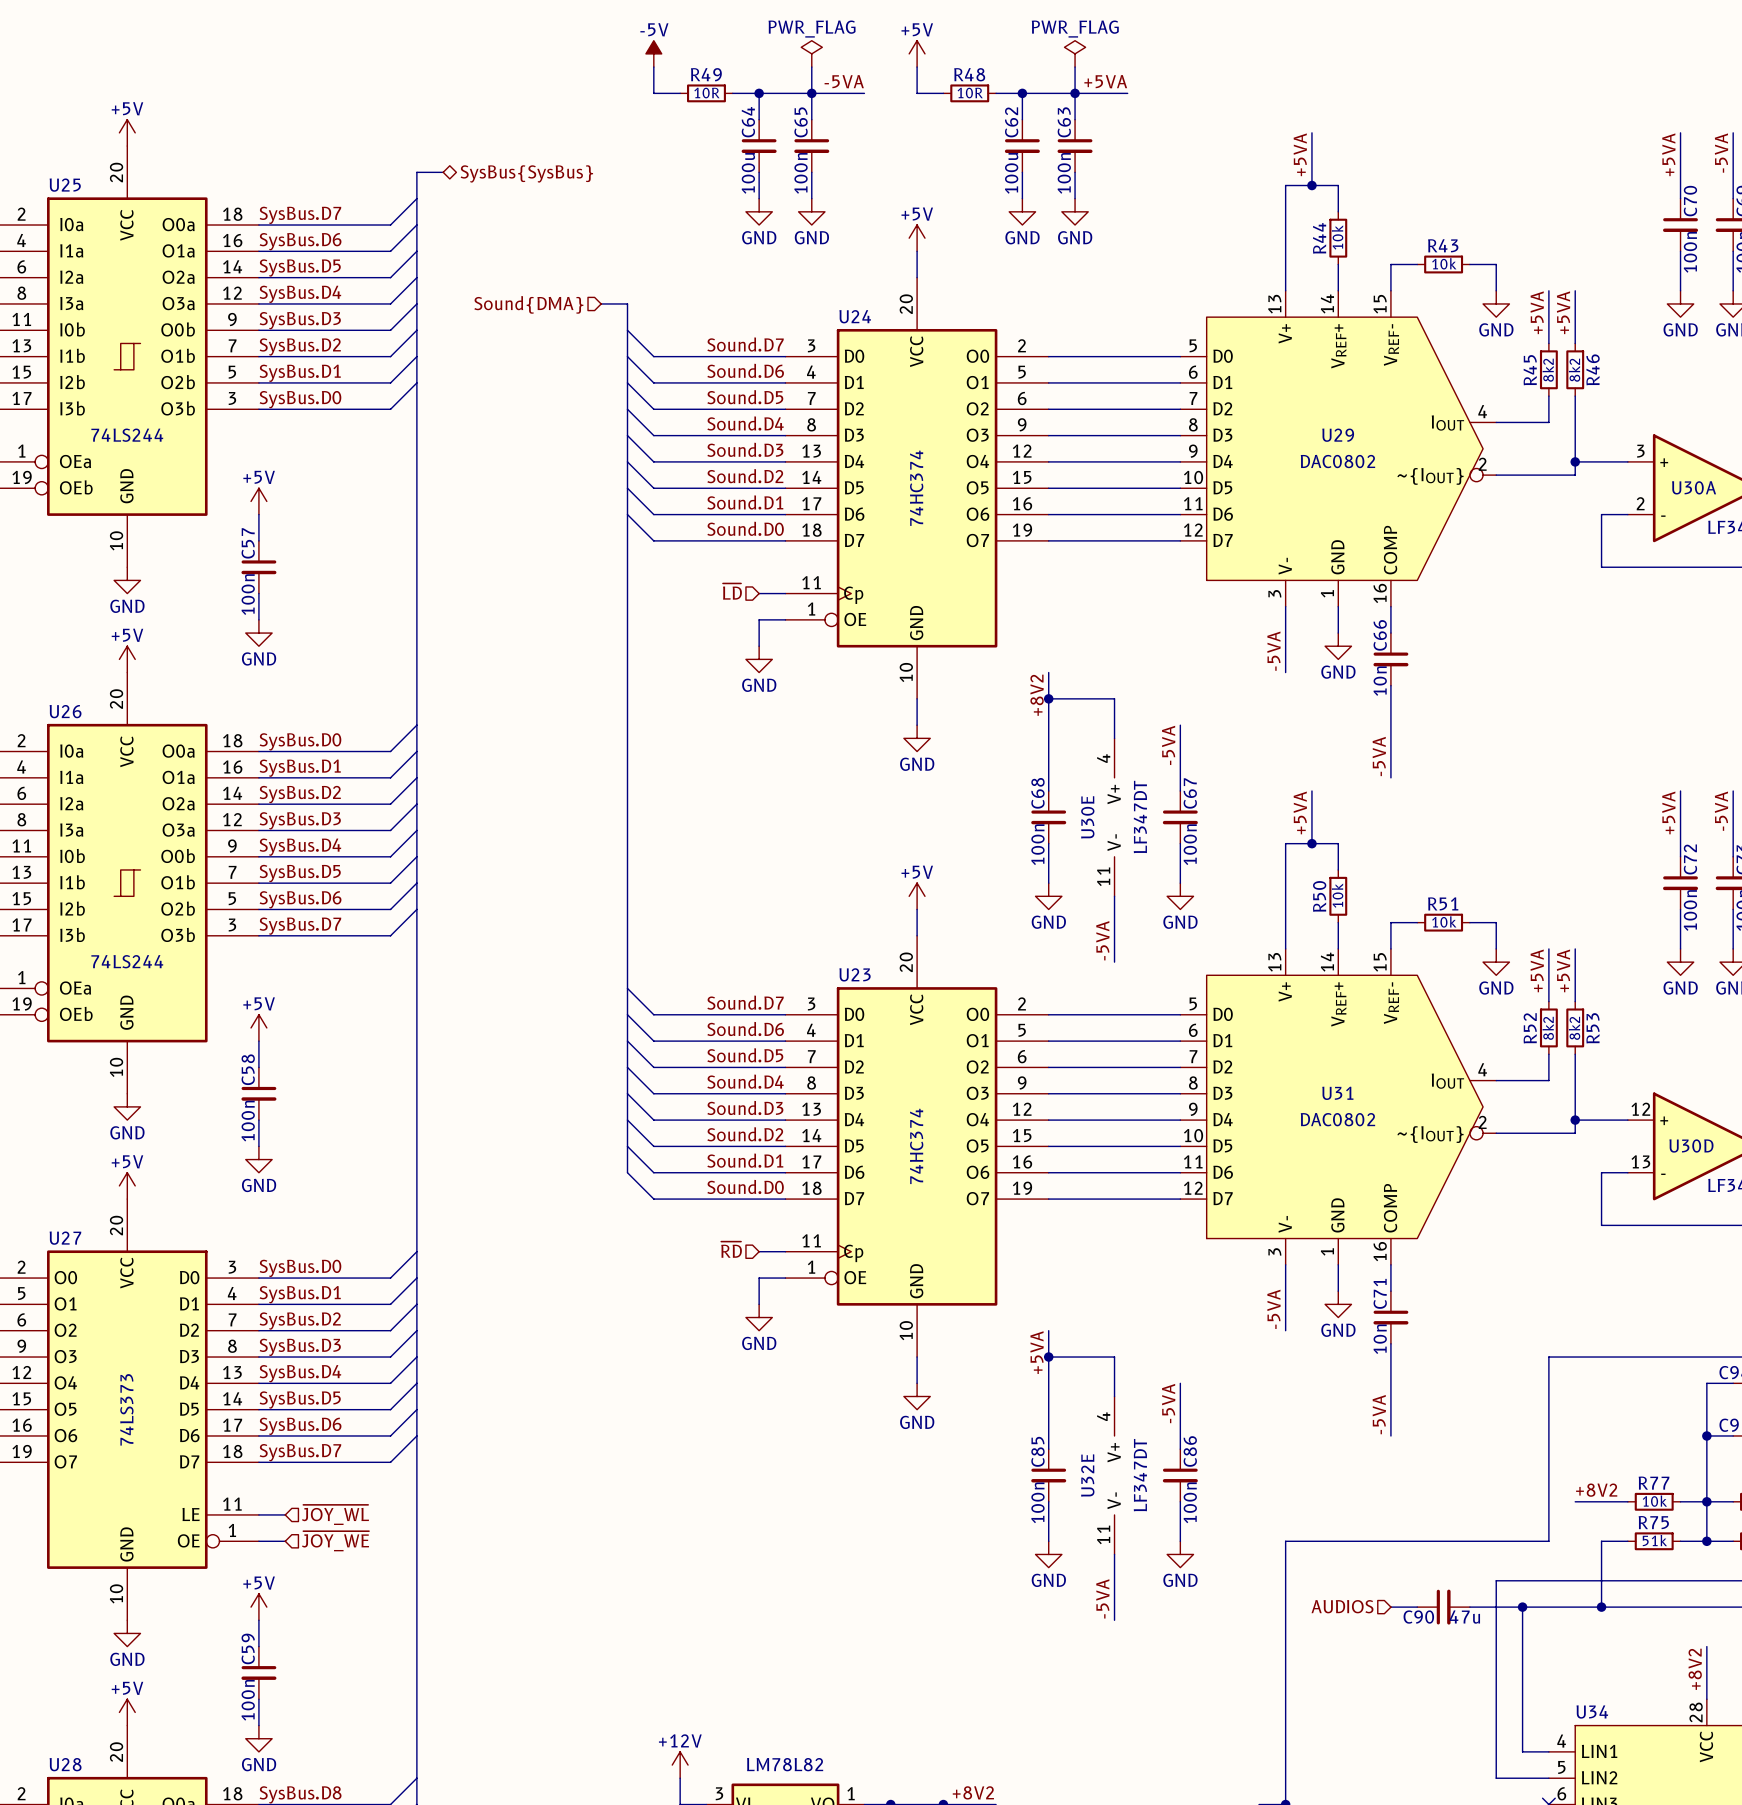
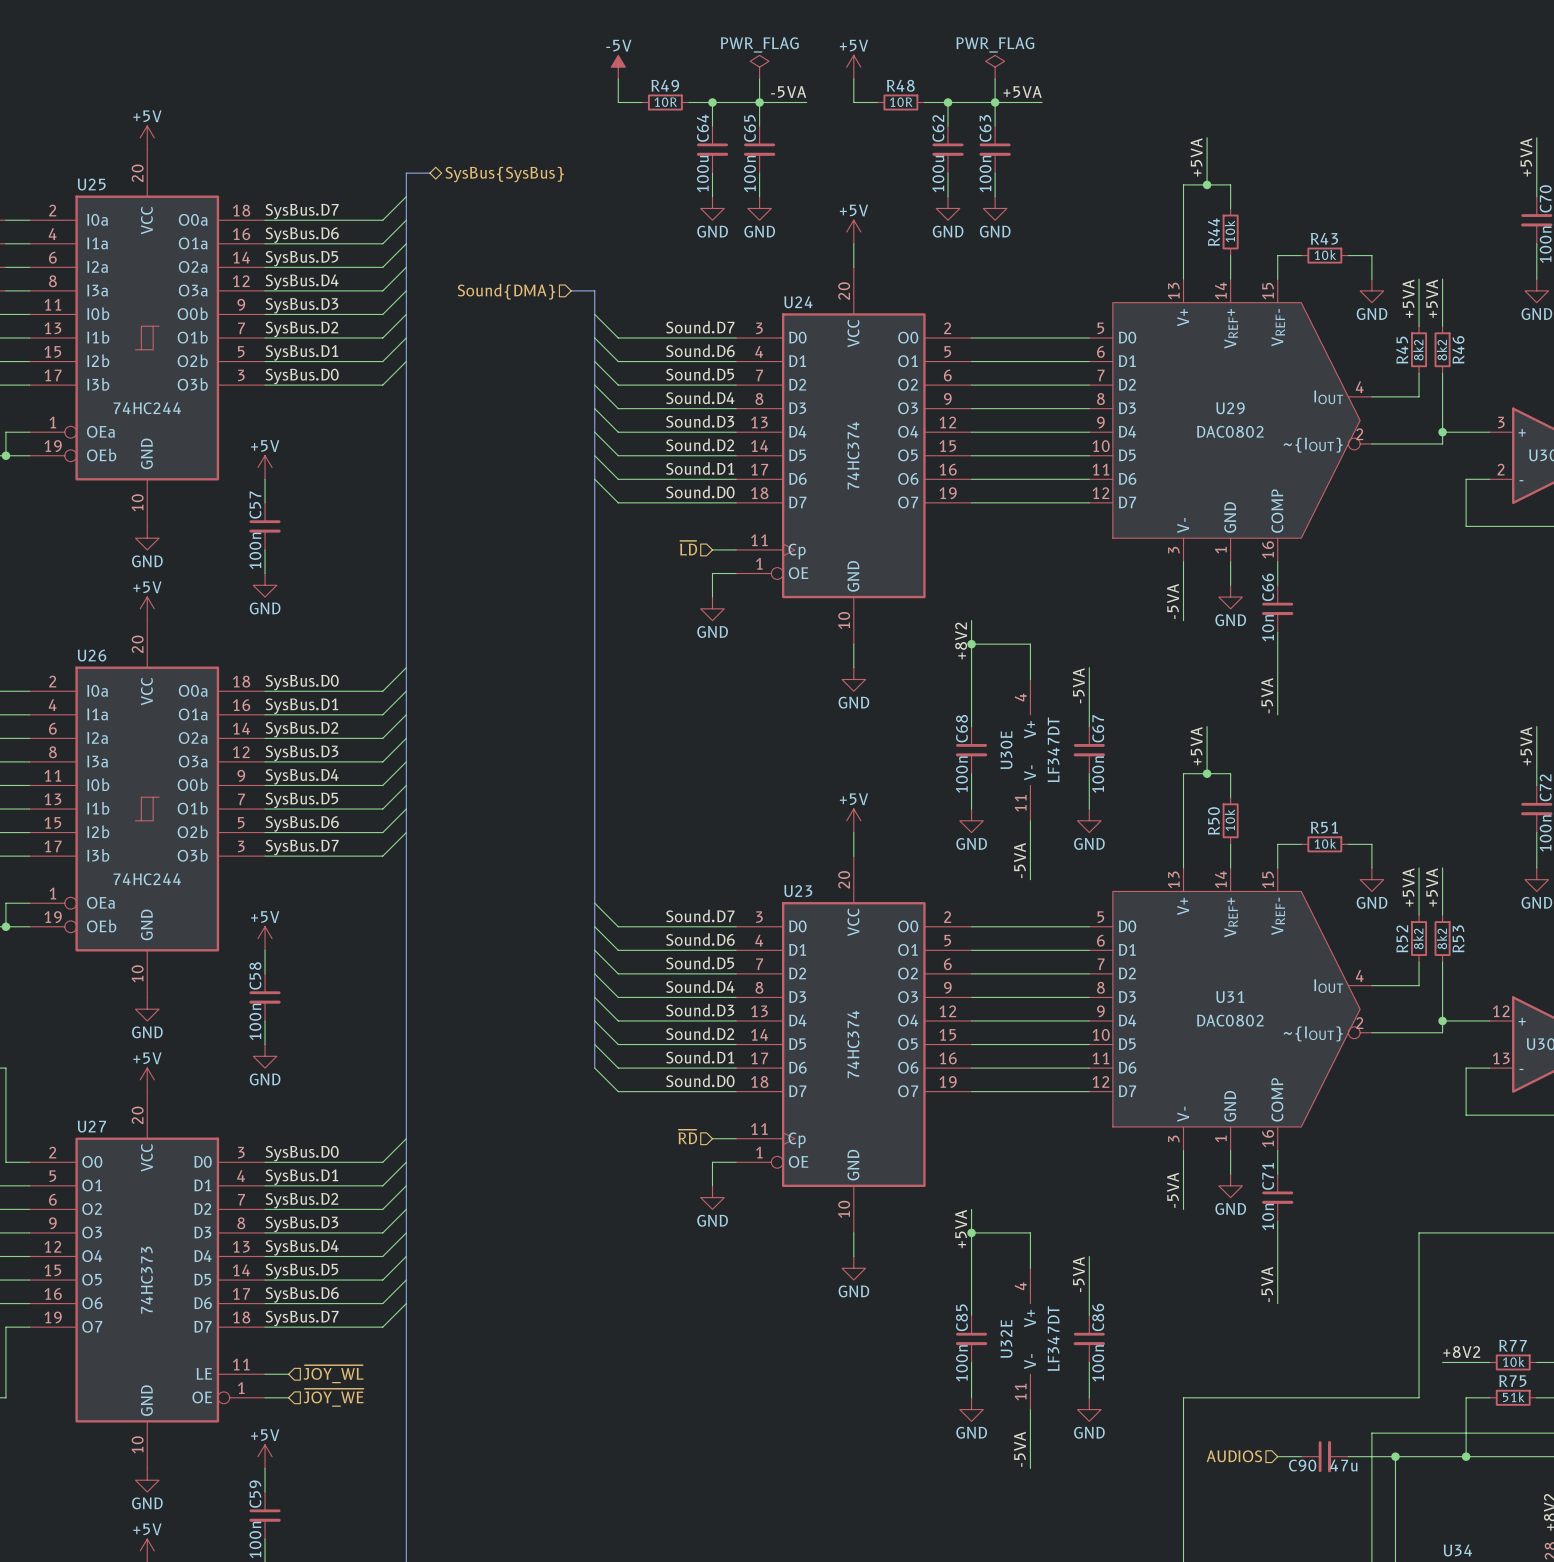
U25 value: 74LS244 (127, 435) -> 74HC244 (147, 408)
U26 value: 74LS244 (127, 961) -> 74HC244 (147, 879)
U27 value: 74LS373 (126, 1409) -> 74HC373 (146, 1280)

